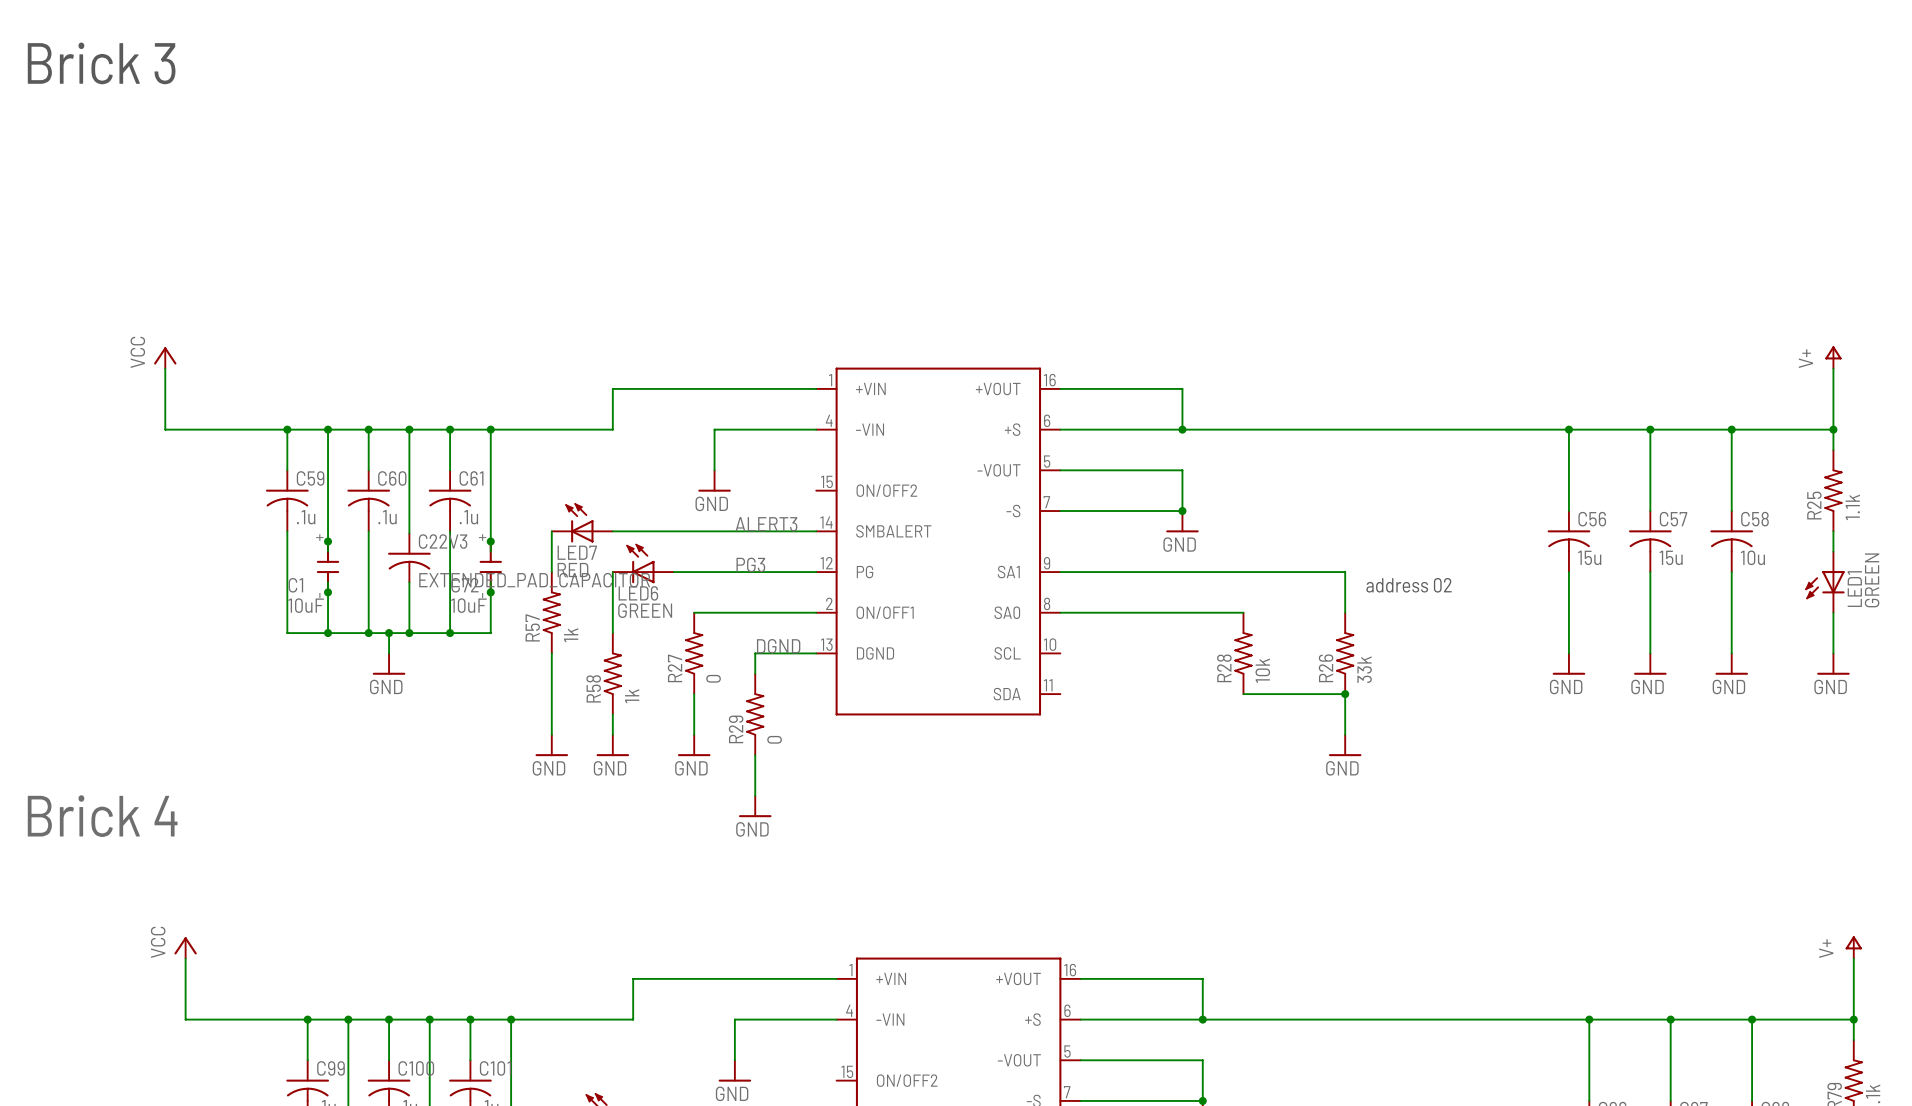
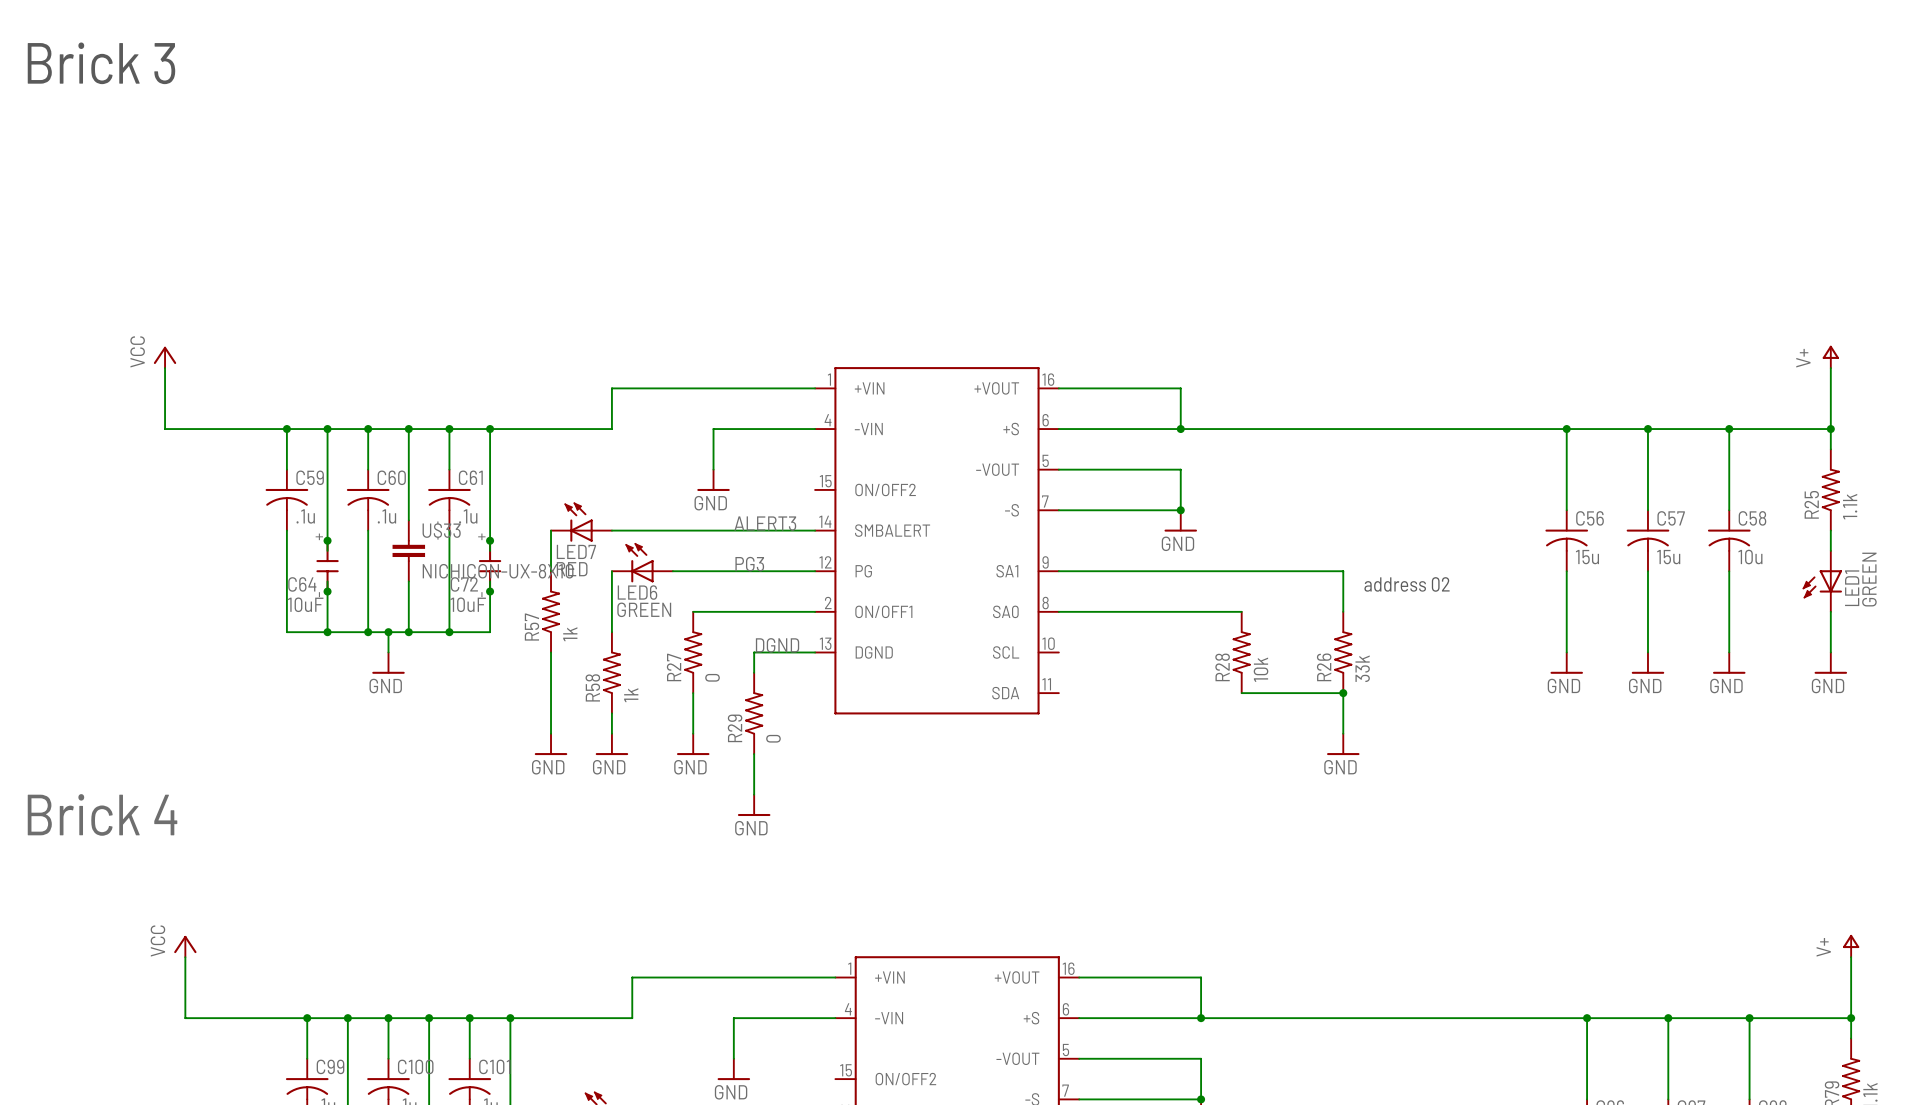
U$33: none -> NICHICON-UX-8X10 (408, 550)
C22V3: EXTENDED_PAD_CAPACITOR (409, 557) -> none
C1 name: C1 (295, 585) -> C64 (302, 584)

